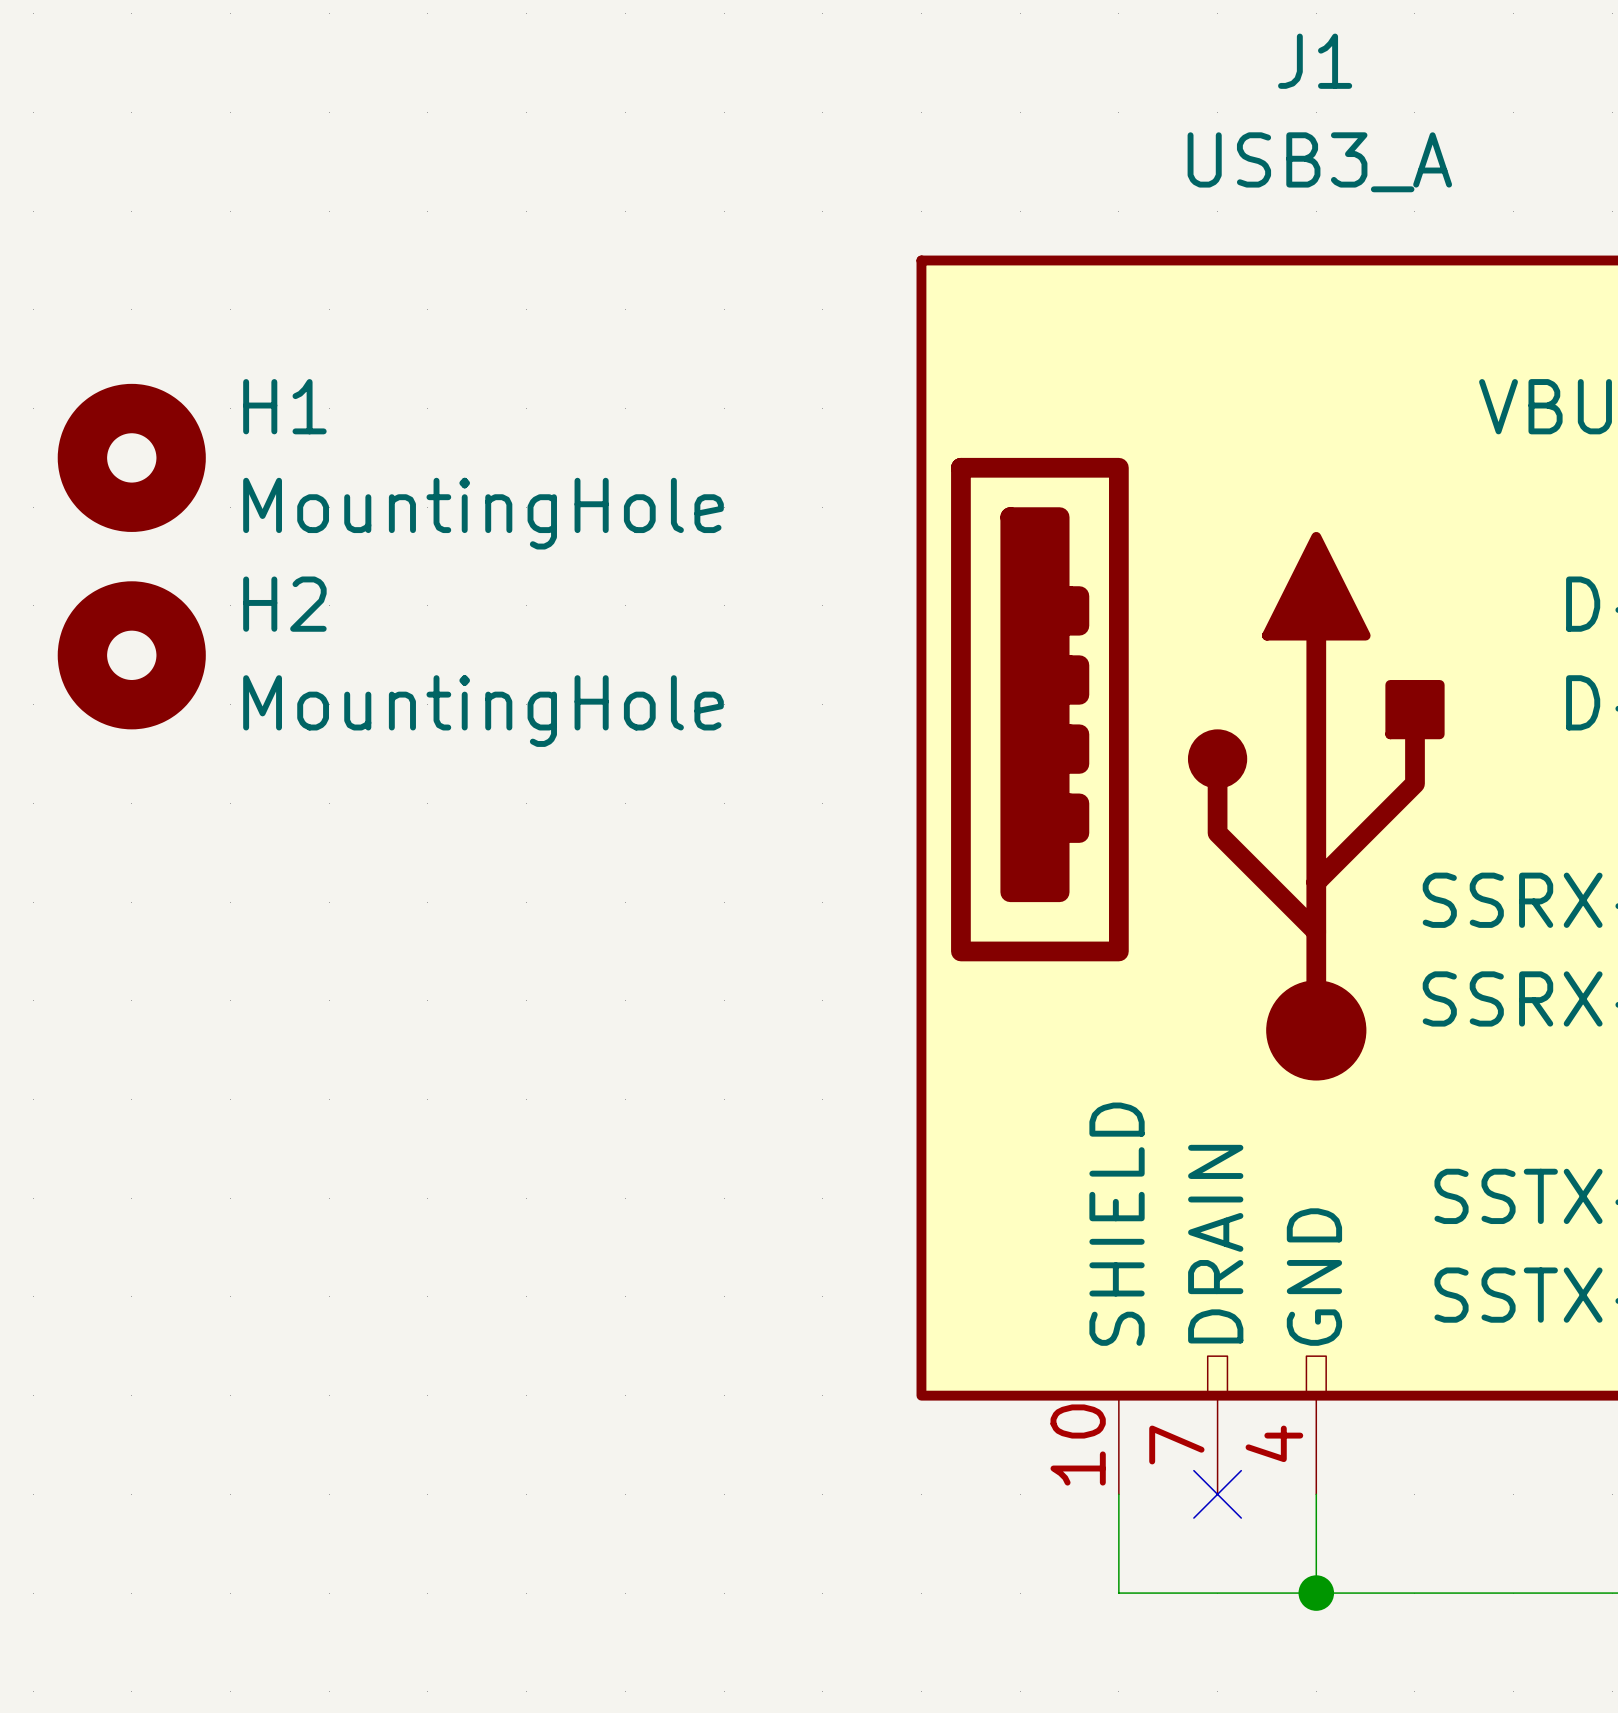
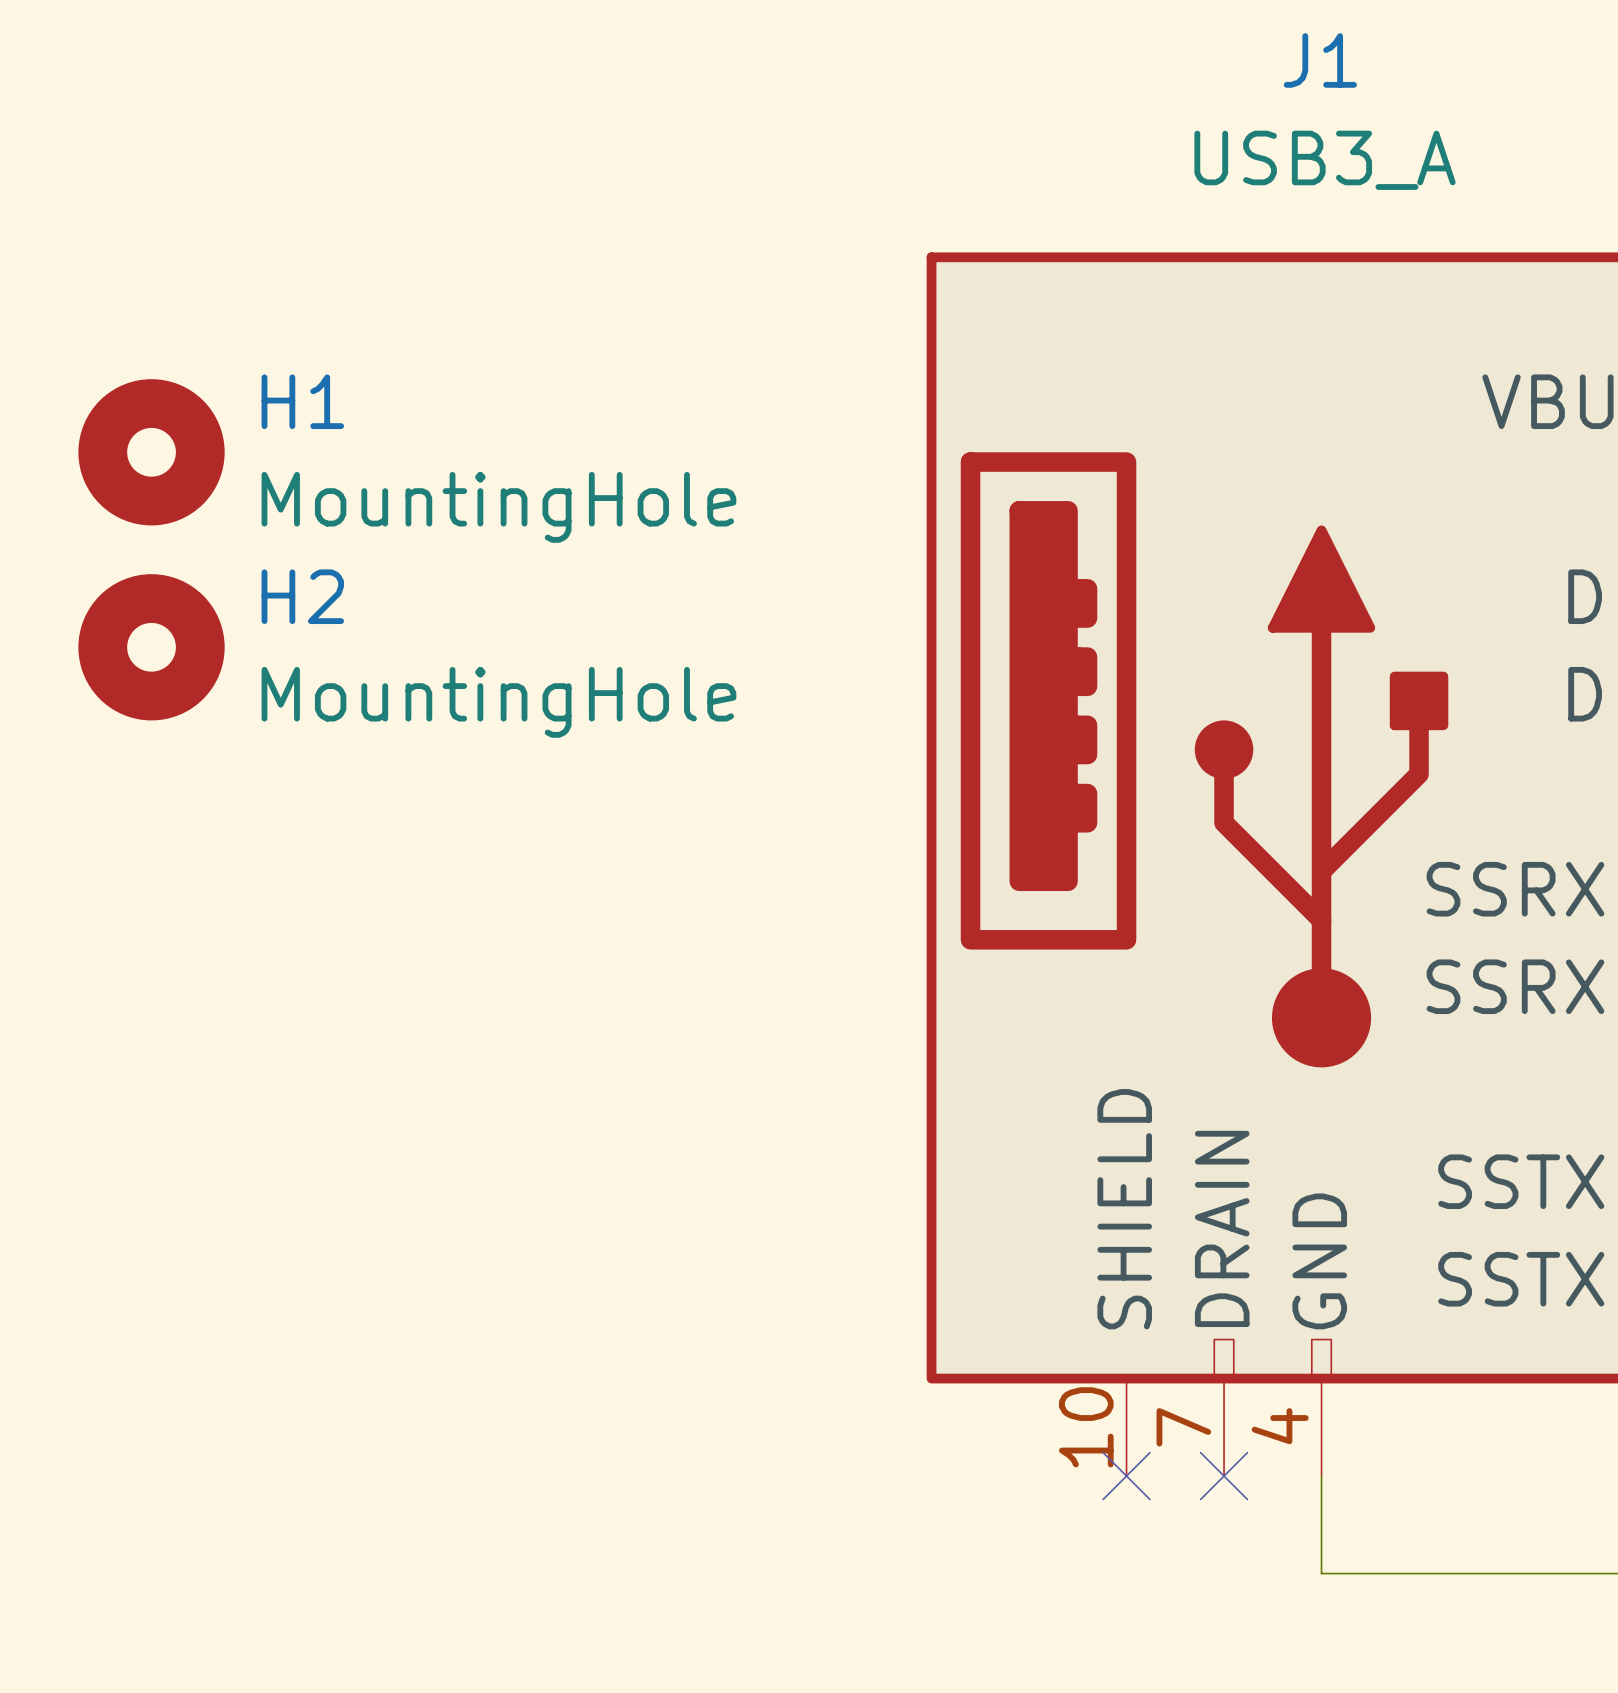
wire: (1118, 1494) (1118, 1593) (1316, 1593) -> none
no-connect mark: none -> (1126, 1476)
junction: (1316, 1593) -> none

